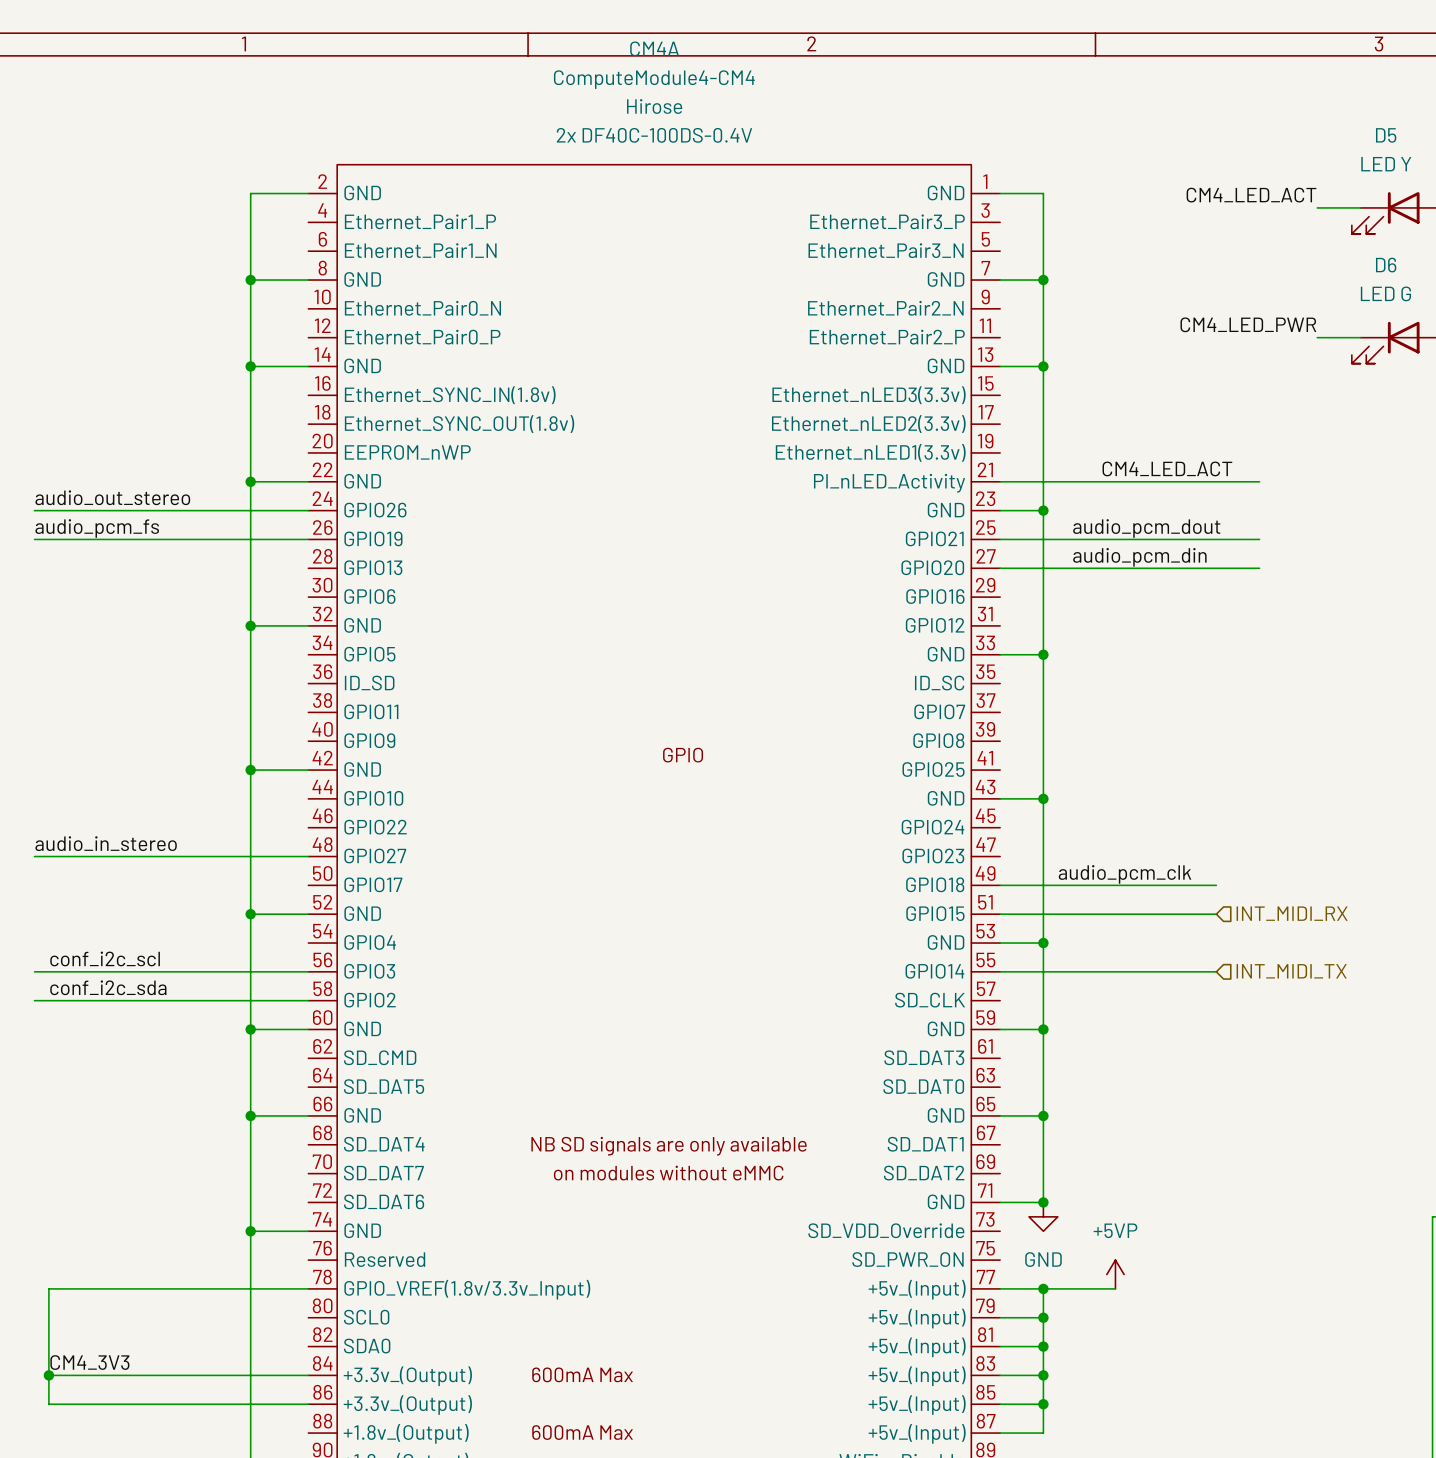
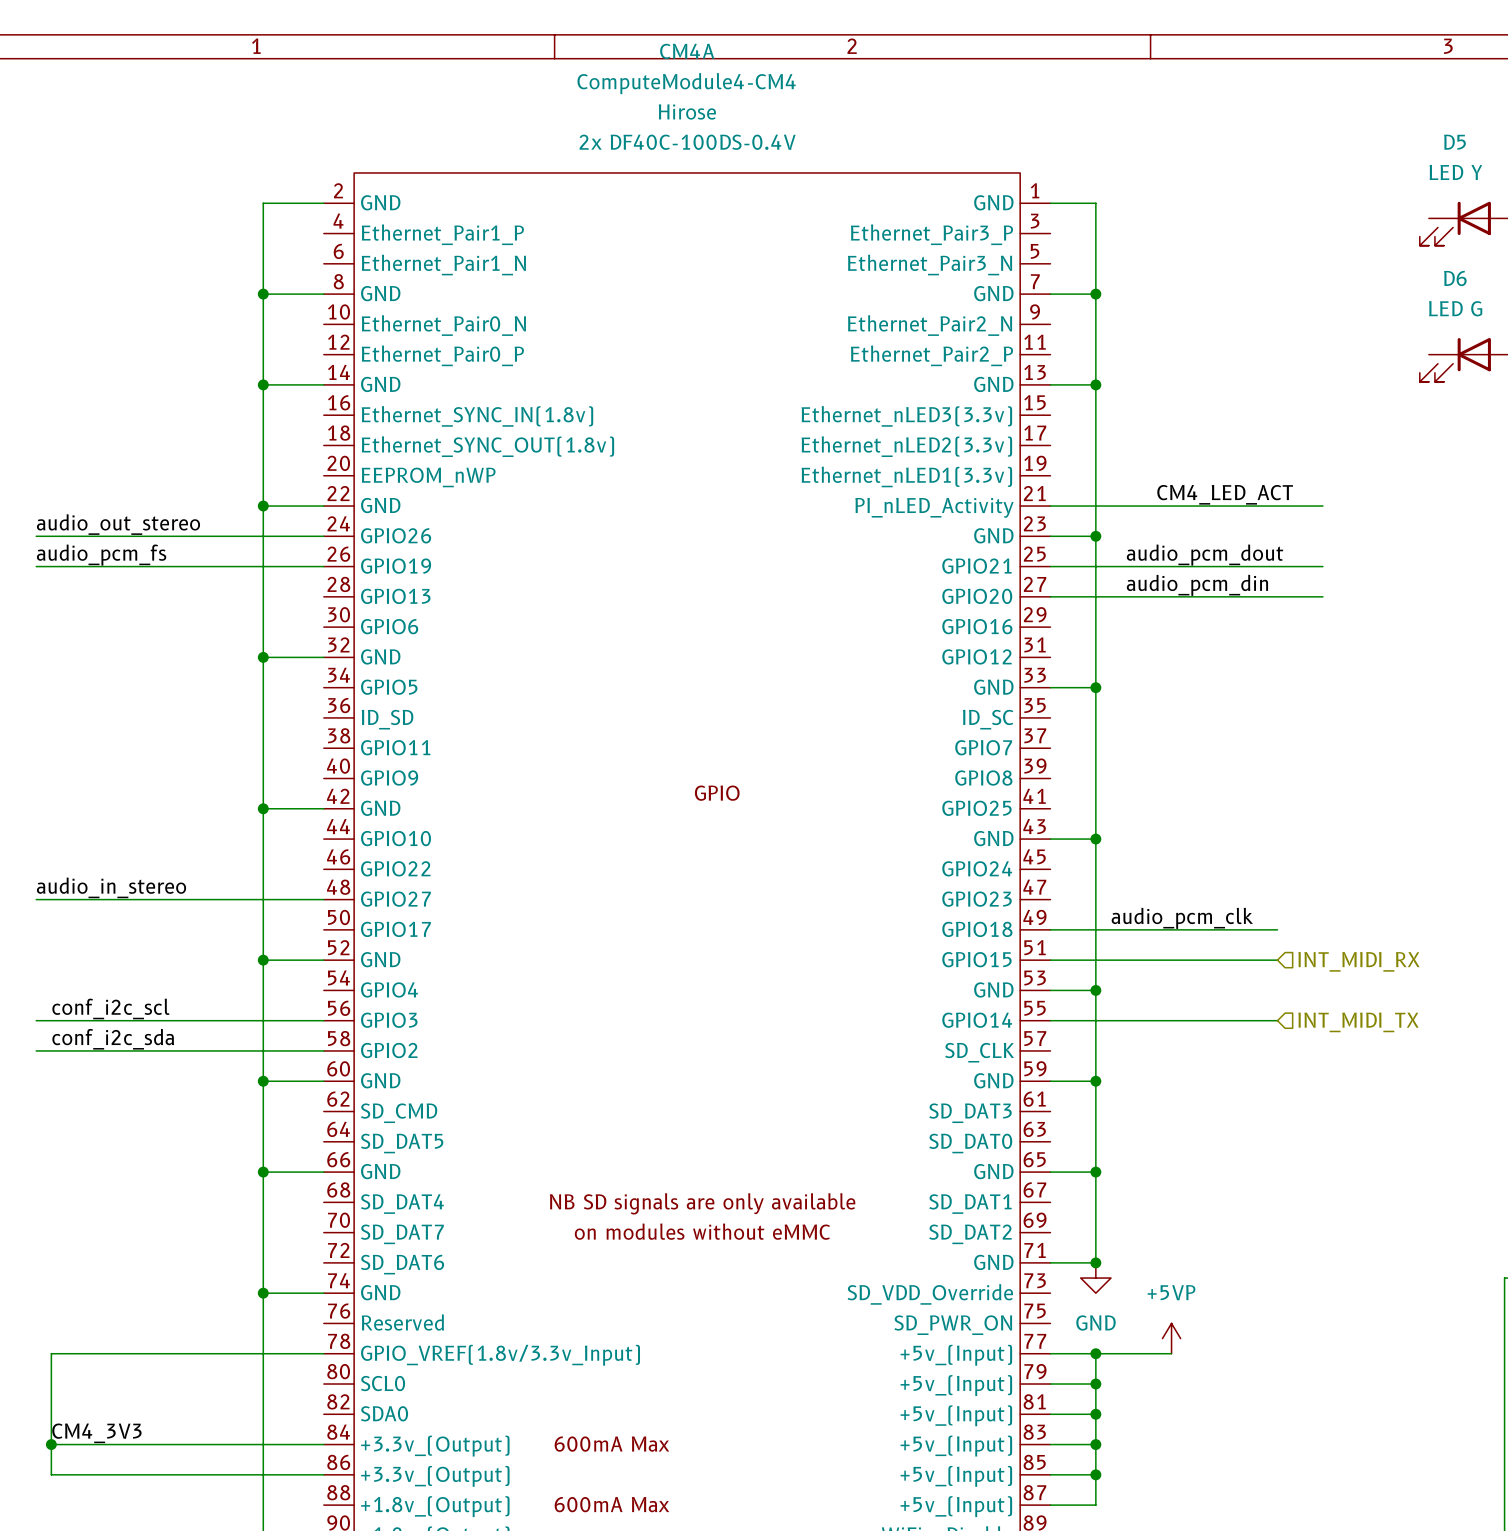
label: CM4_LED_ACT (1251, 195) -> none
wire: (1317, 207) (1360, 207) -> none
label: CM4_LED_PWR (1248, 324) -> none
wire: (1317, 337) (1360, 337) -> none

